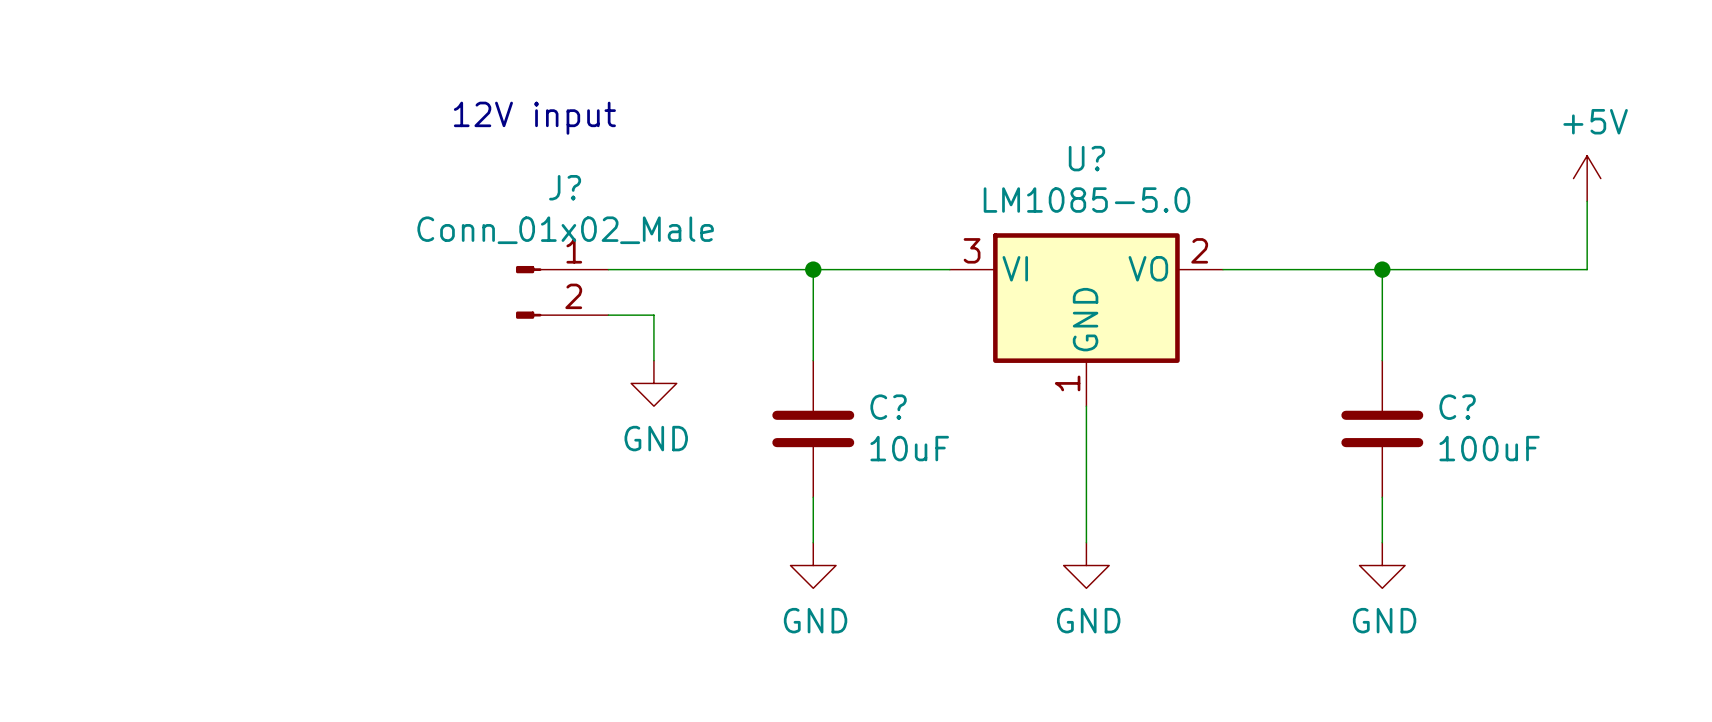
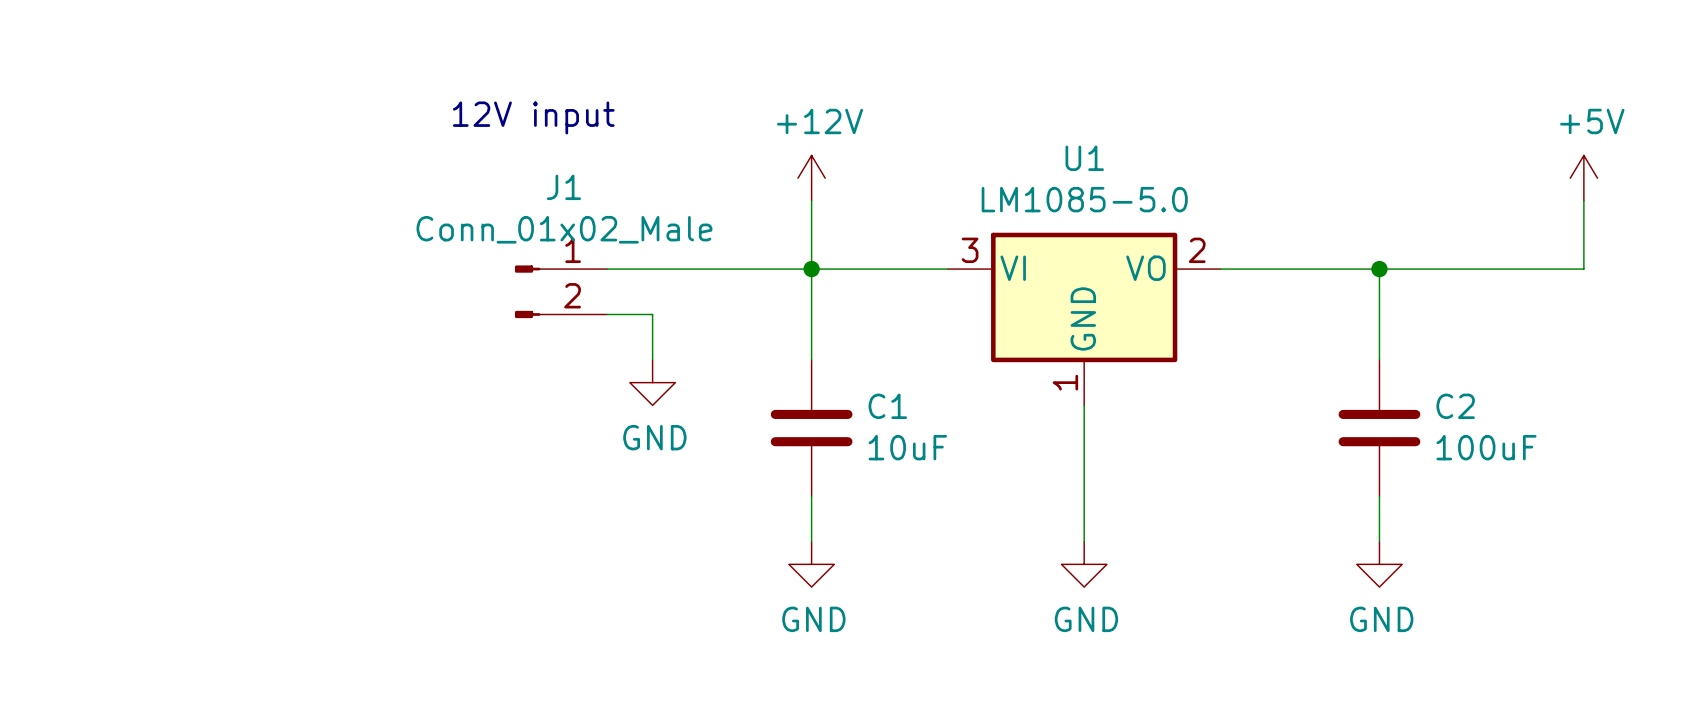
U? name: U? (1086, 158) -> U1 (1084, 158)
power symbol: none -> +12V (811, 178)
J? name: J? (565, 187) -> J1 (563, 187)
wire: none -> (811, 200) (811, 269)
C? name: C? (888, 407) -> C1 (887, 406)
C? name: C? (1457, 407) -> C2 (1455, 406)

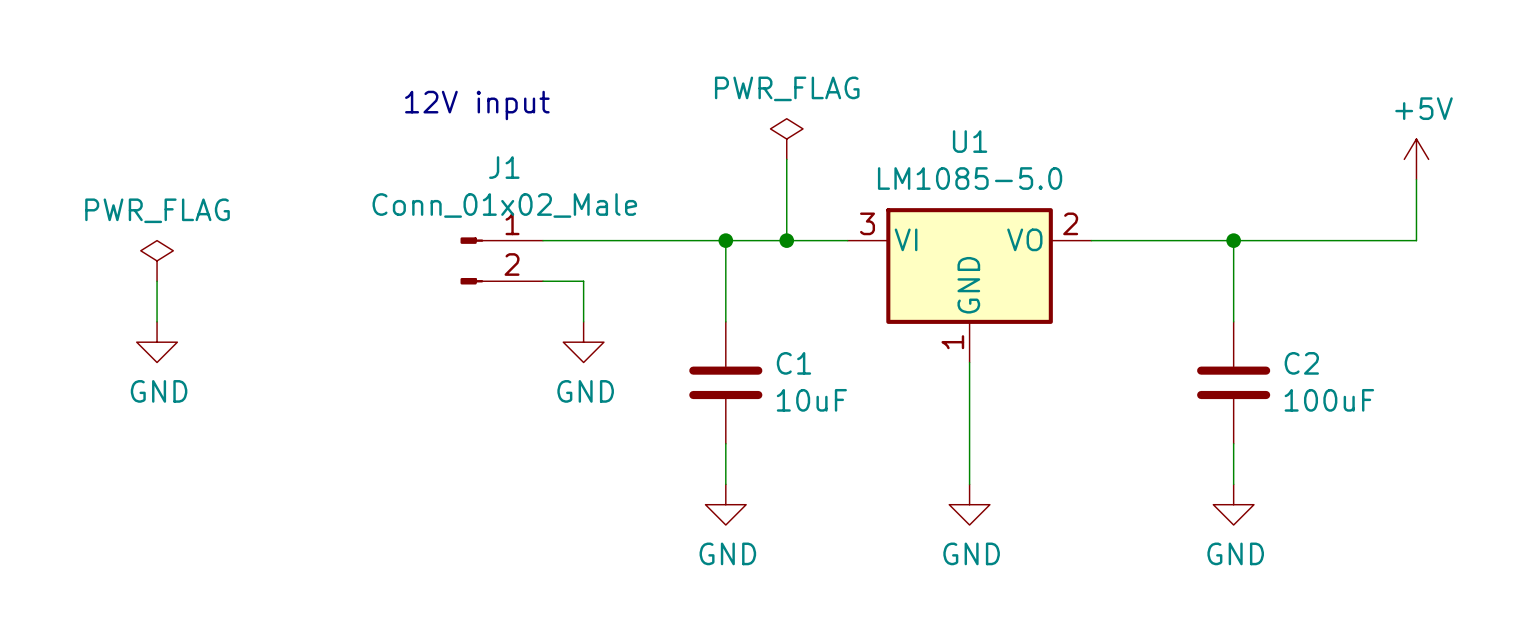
power symbol: none -> PWR_FLAG (786, 139)
power symbol: +12V (811, 178) -> none
wire: none -> (786, 159) (786, 240)
wire: (811, 200) (811, 269) -> none
junction: none -> (786, 240)
power symbol: none -> PWR_FLAG (157, 260)
wire: none -> (157, 281) (157, 321)
power symbol: none -> GND (157, 342)

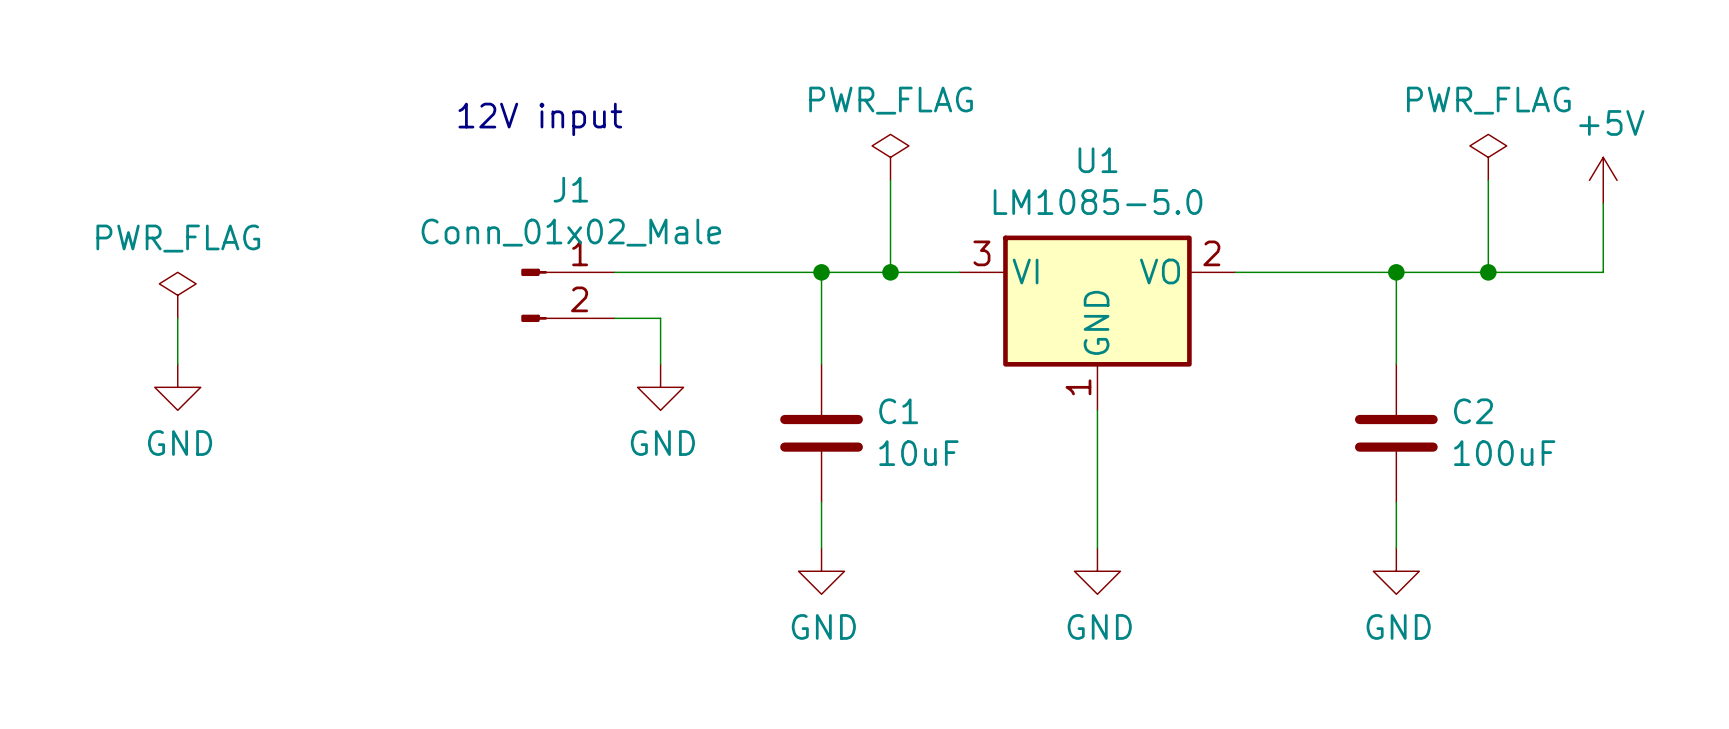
power symbol: none -> PWR_FLAG (1488, 157)
wire: none -> (1488, 180) (1488, 272)
junction: none -> (1488, 272)

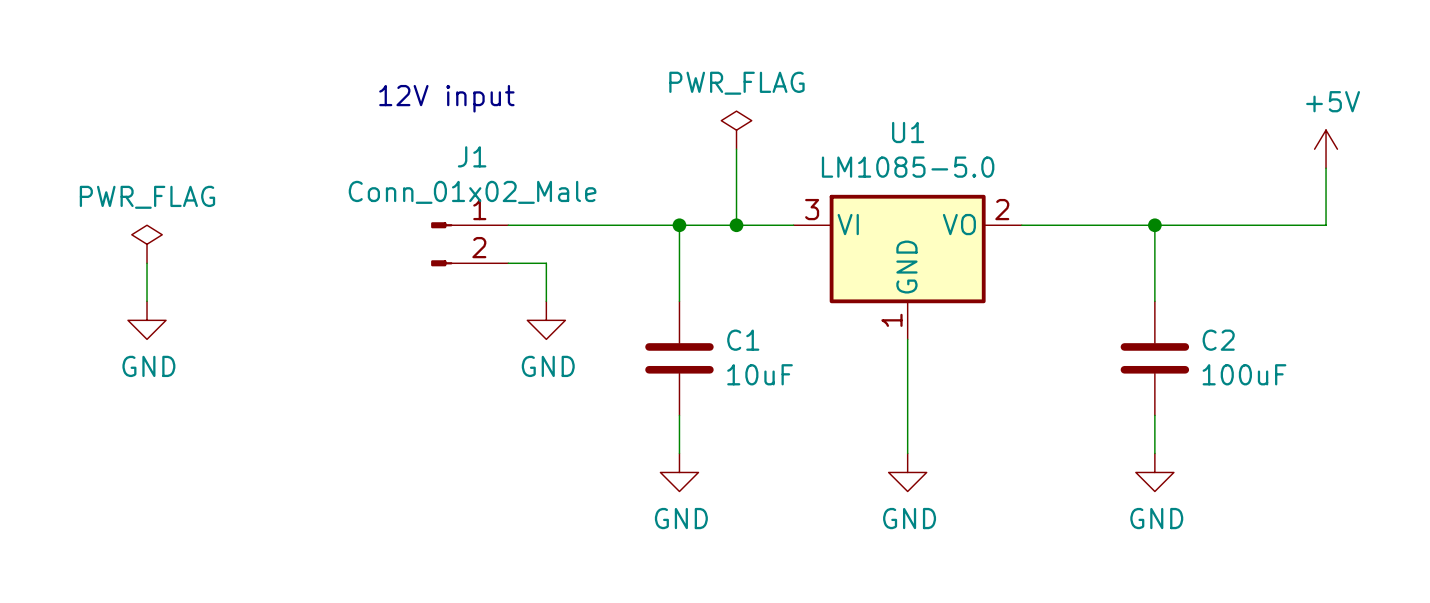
power symbol: PWR_FLAG (1488, 157) -> none
wire: (1488, 180) (1488, 272) -> none
junction: (1488, 272) -> none

